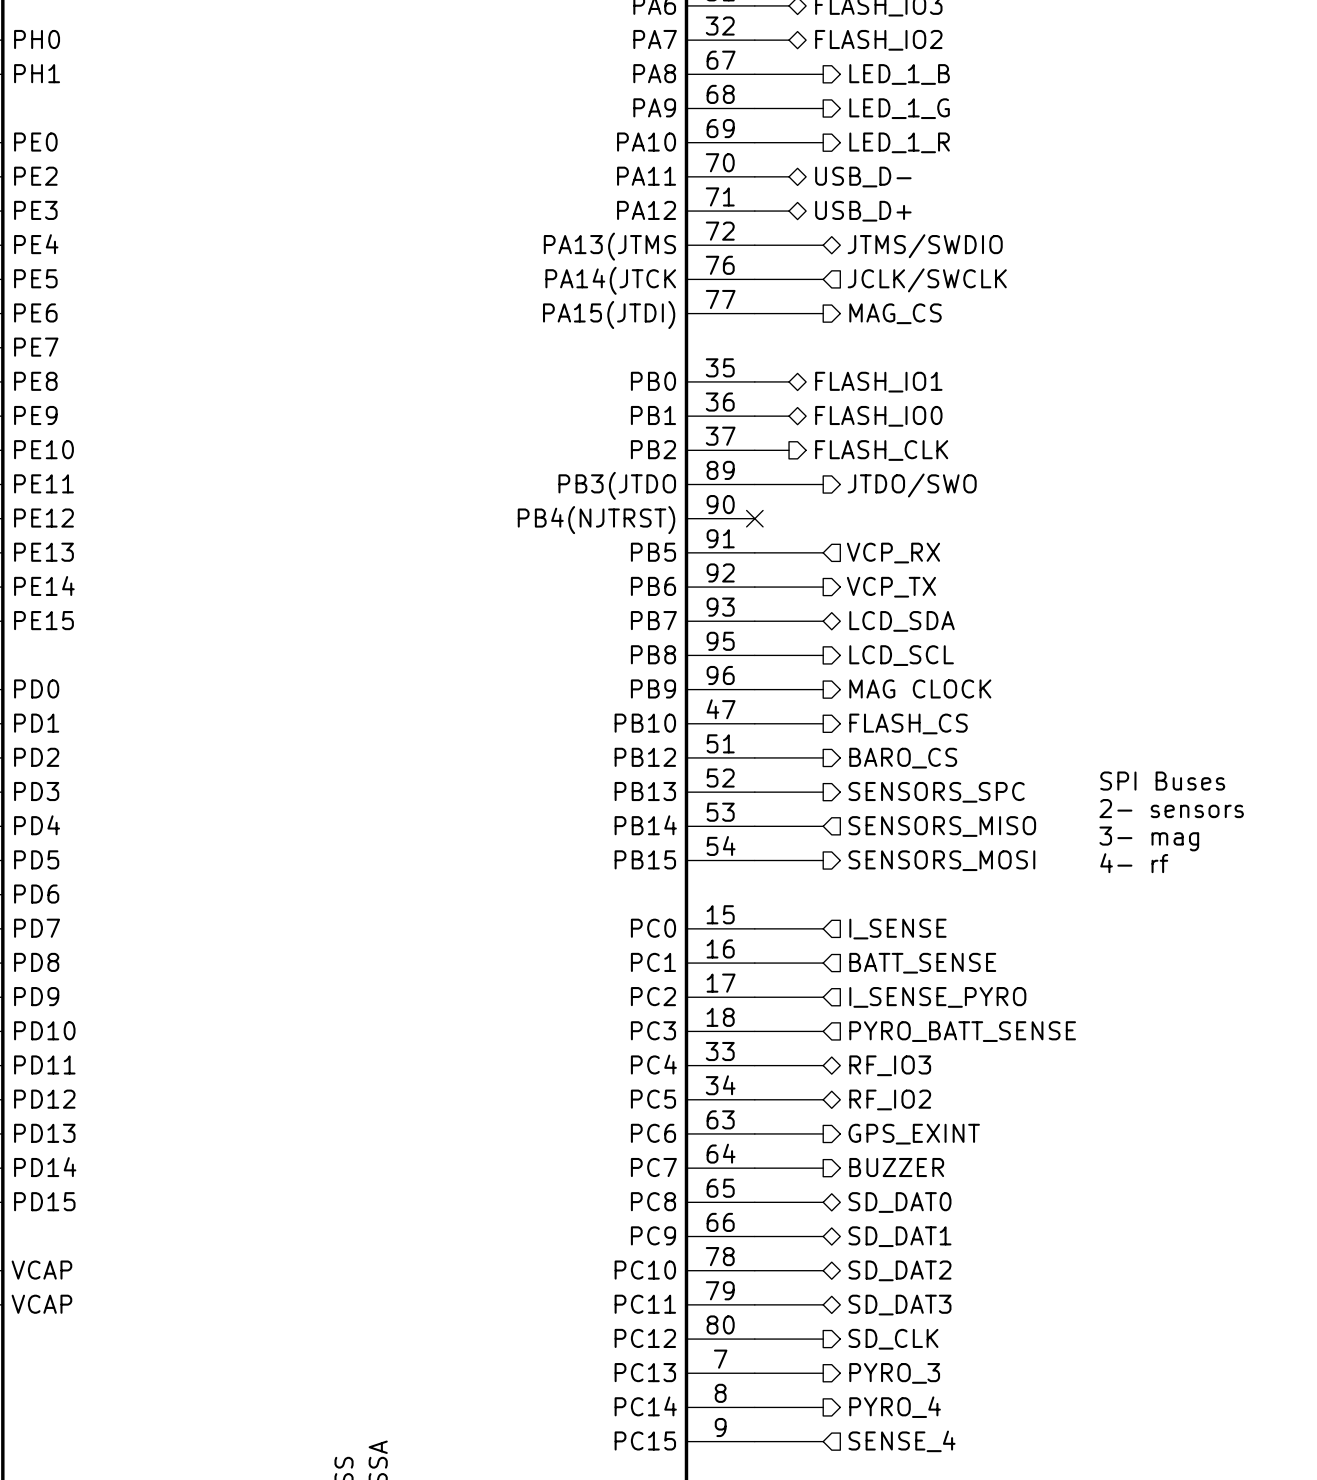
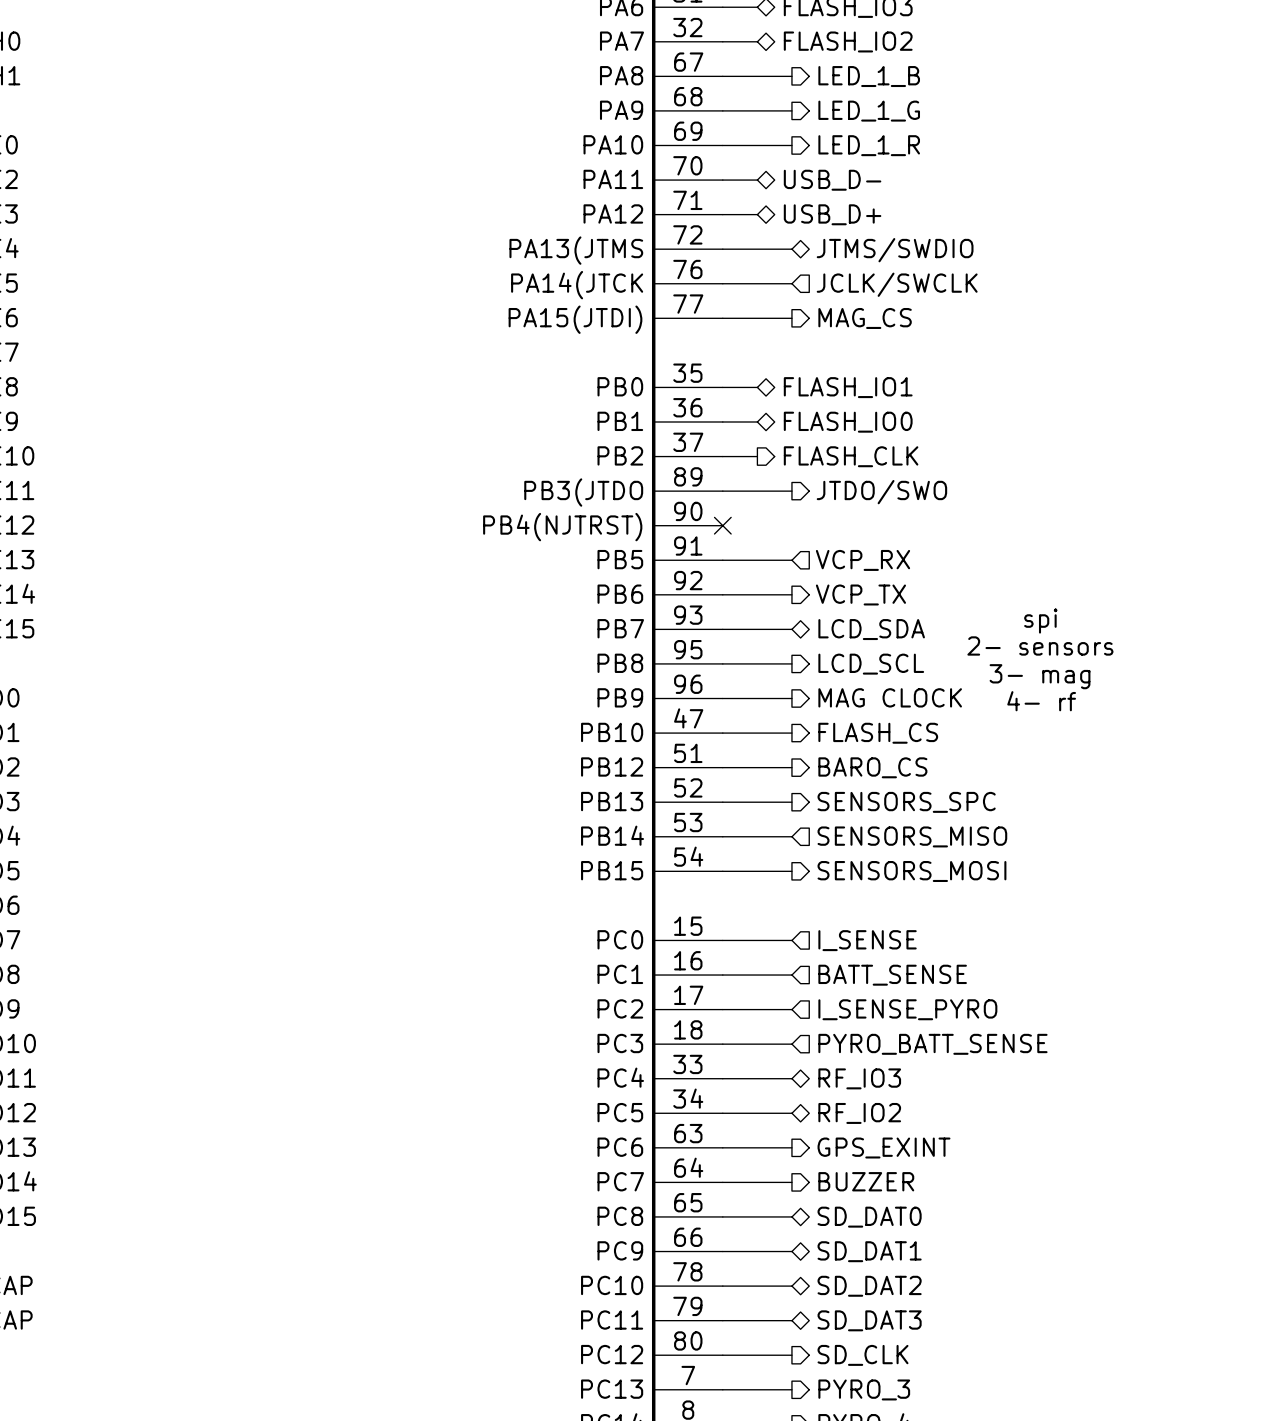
text: none -> spi (1040, 621)
text: SPI Buses (1162, 781) -> none
text position: 2- sensors (1171, 808) -> 2- sensors (1040, 645)
text position: 3- mag (1149, 838) -> 3- mag (1040, 676)
text position: 4- rf (1134, 863) -> 4- rf (1041, 701)

